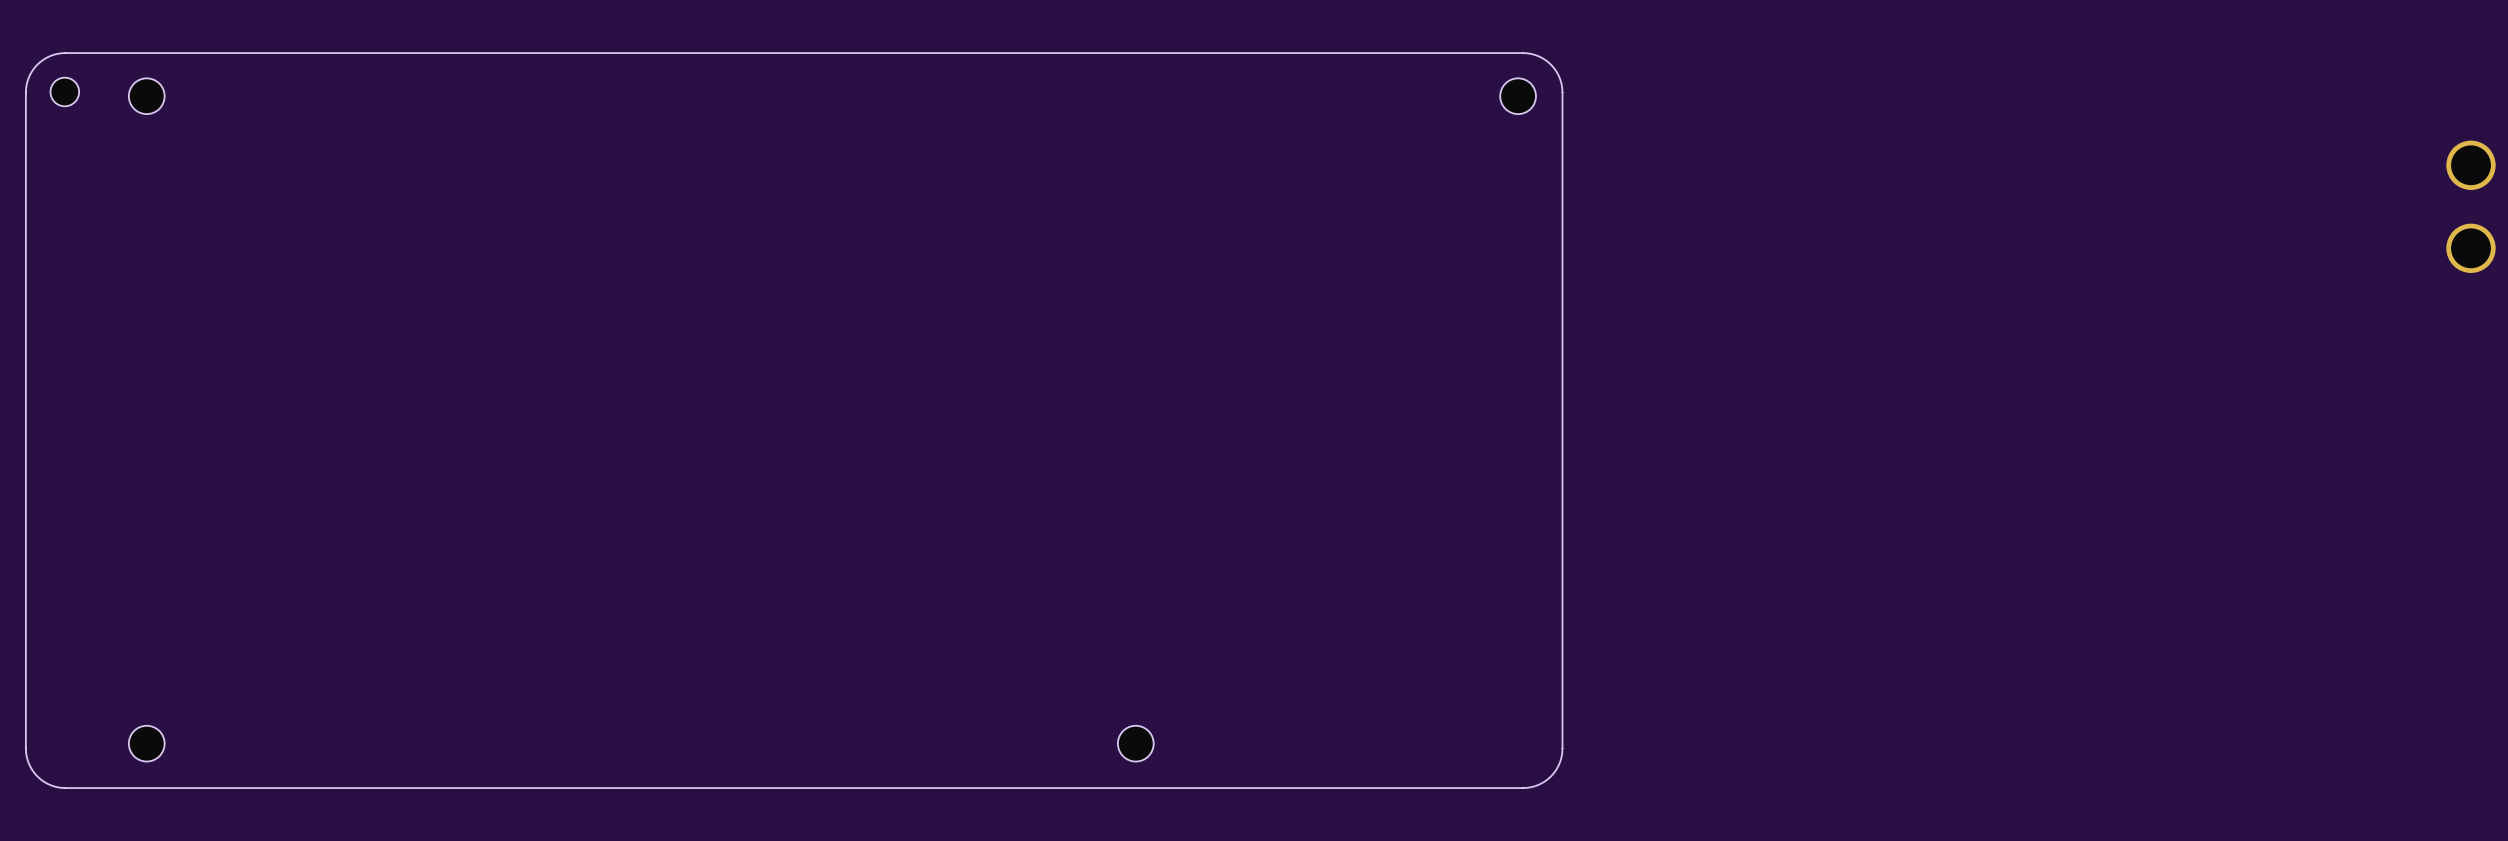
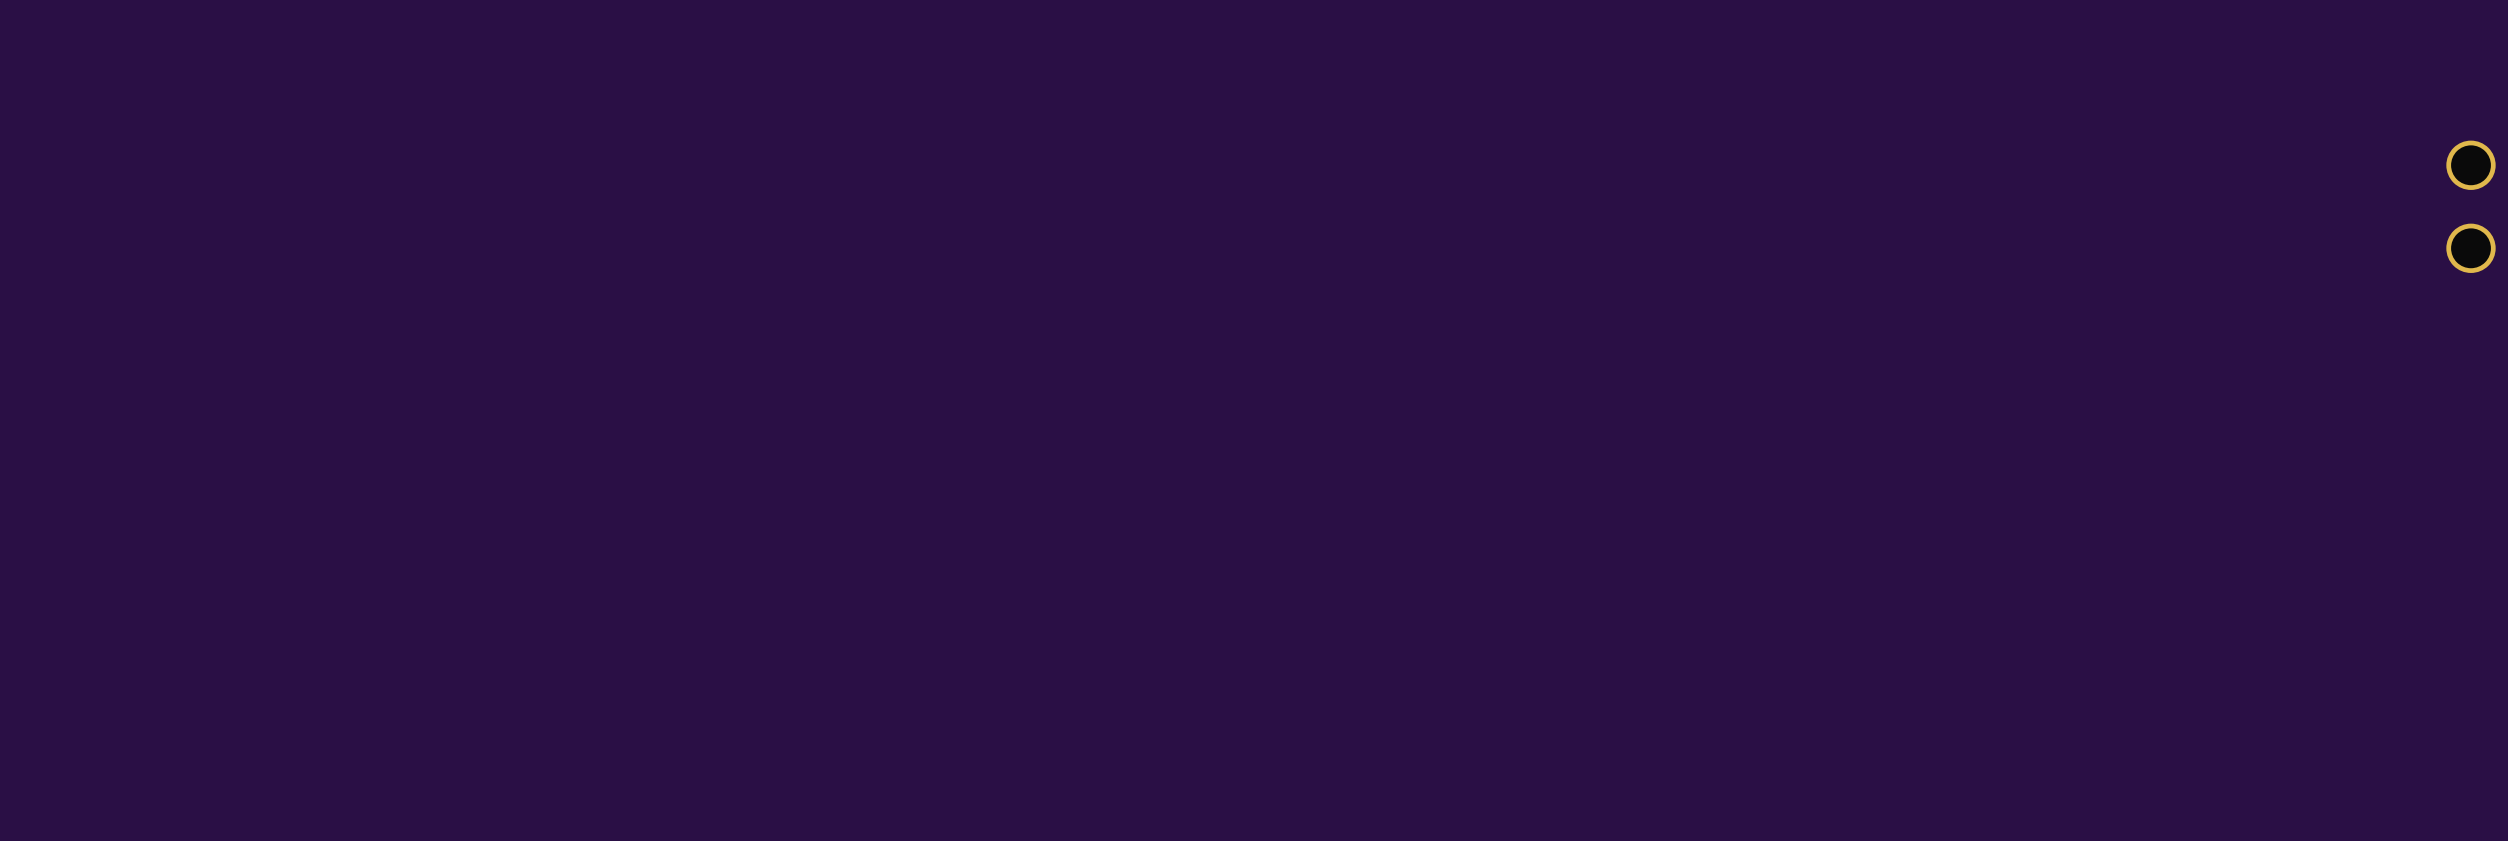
board edge: (1523, 53) (65, 53) (48, 56) (31, 71) (25, 92) (25, 748) (29, 765) (44, 782) (65, 788) (1523, 788) (1540, 784) (1556, 769) (1562, 748) (1562, 92) (1558, 75) (1550, 64) (1536, 55) (1523, 53) -> none
part: (64, 91) -> none
part: (146, 96) -> none
part: (1518, 96) -> none
part: (146, 743) -> none
part: (1135, 743) -> none

